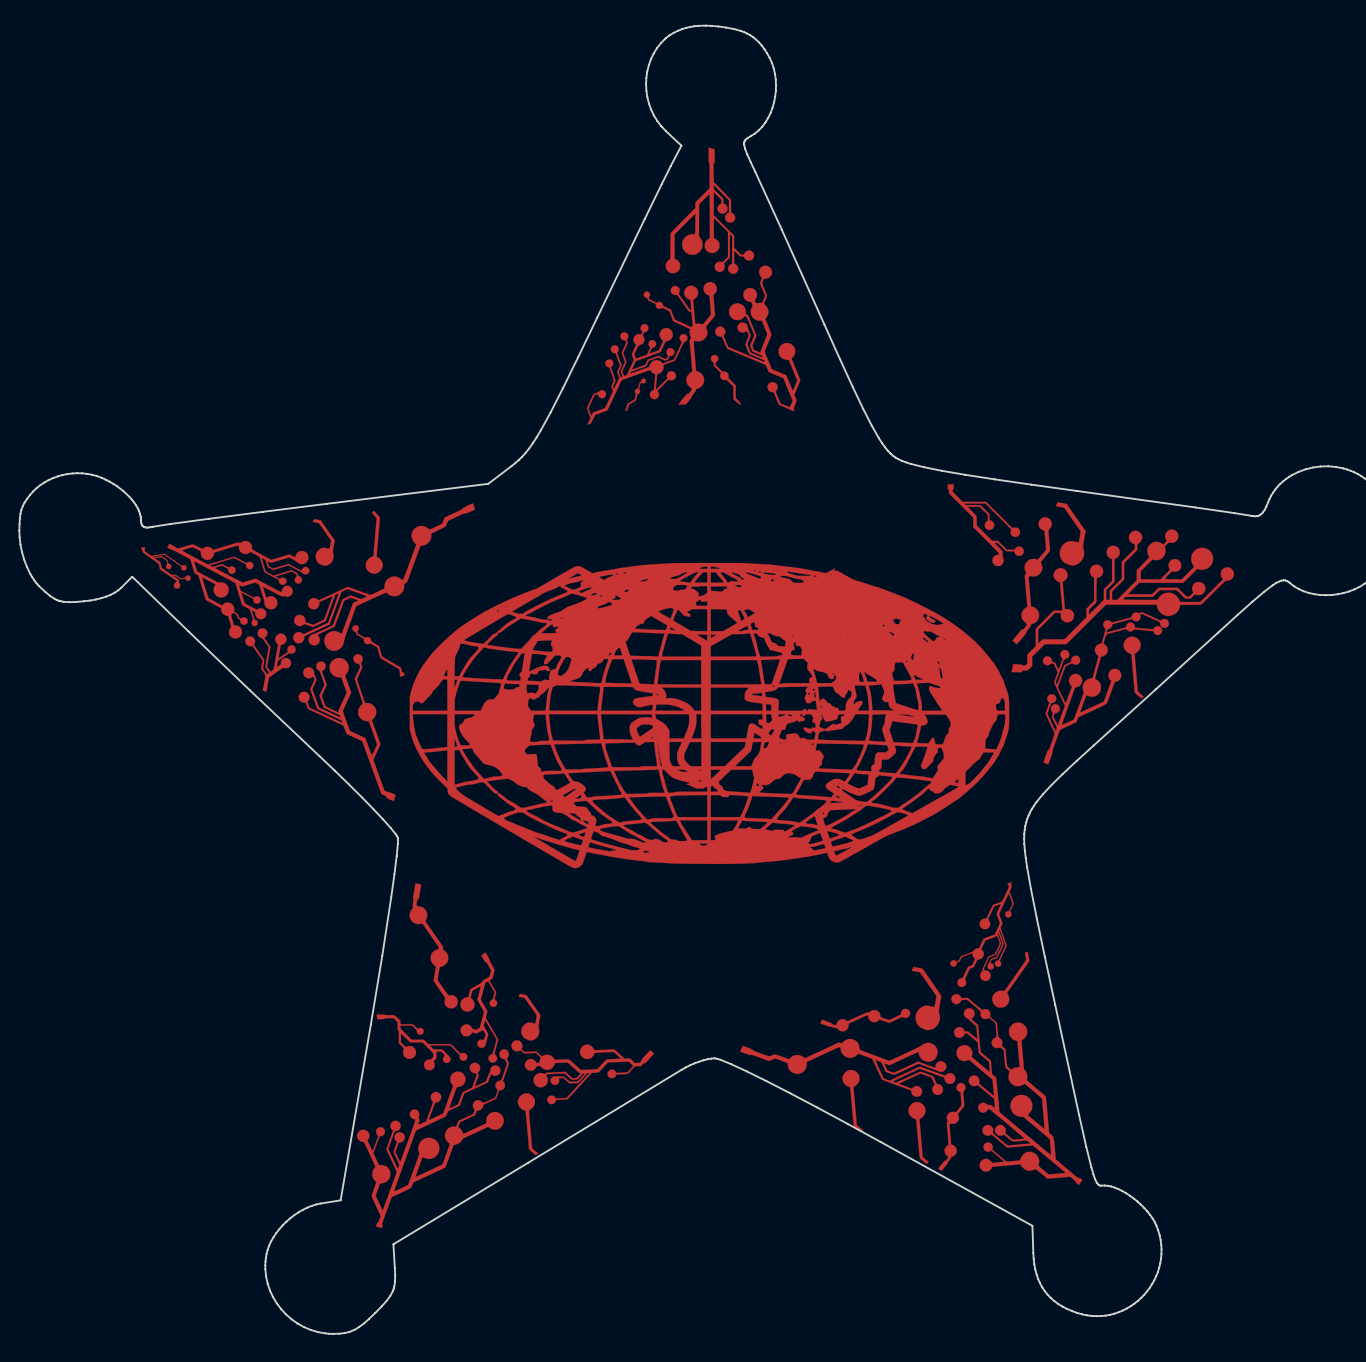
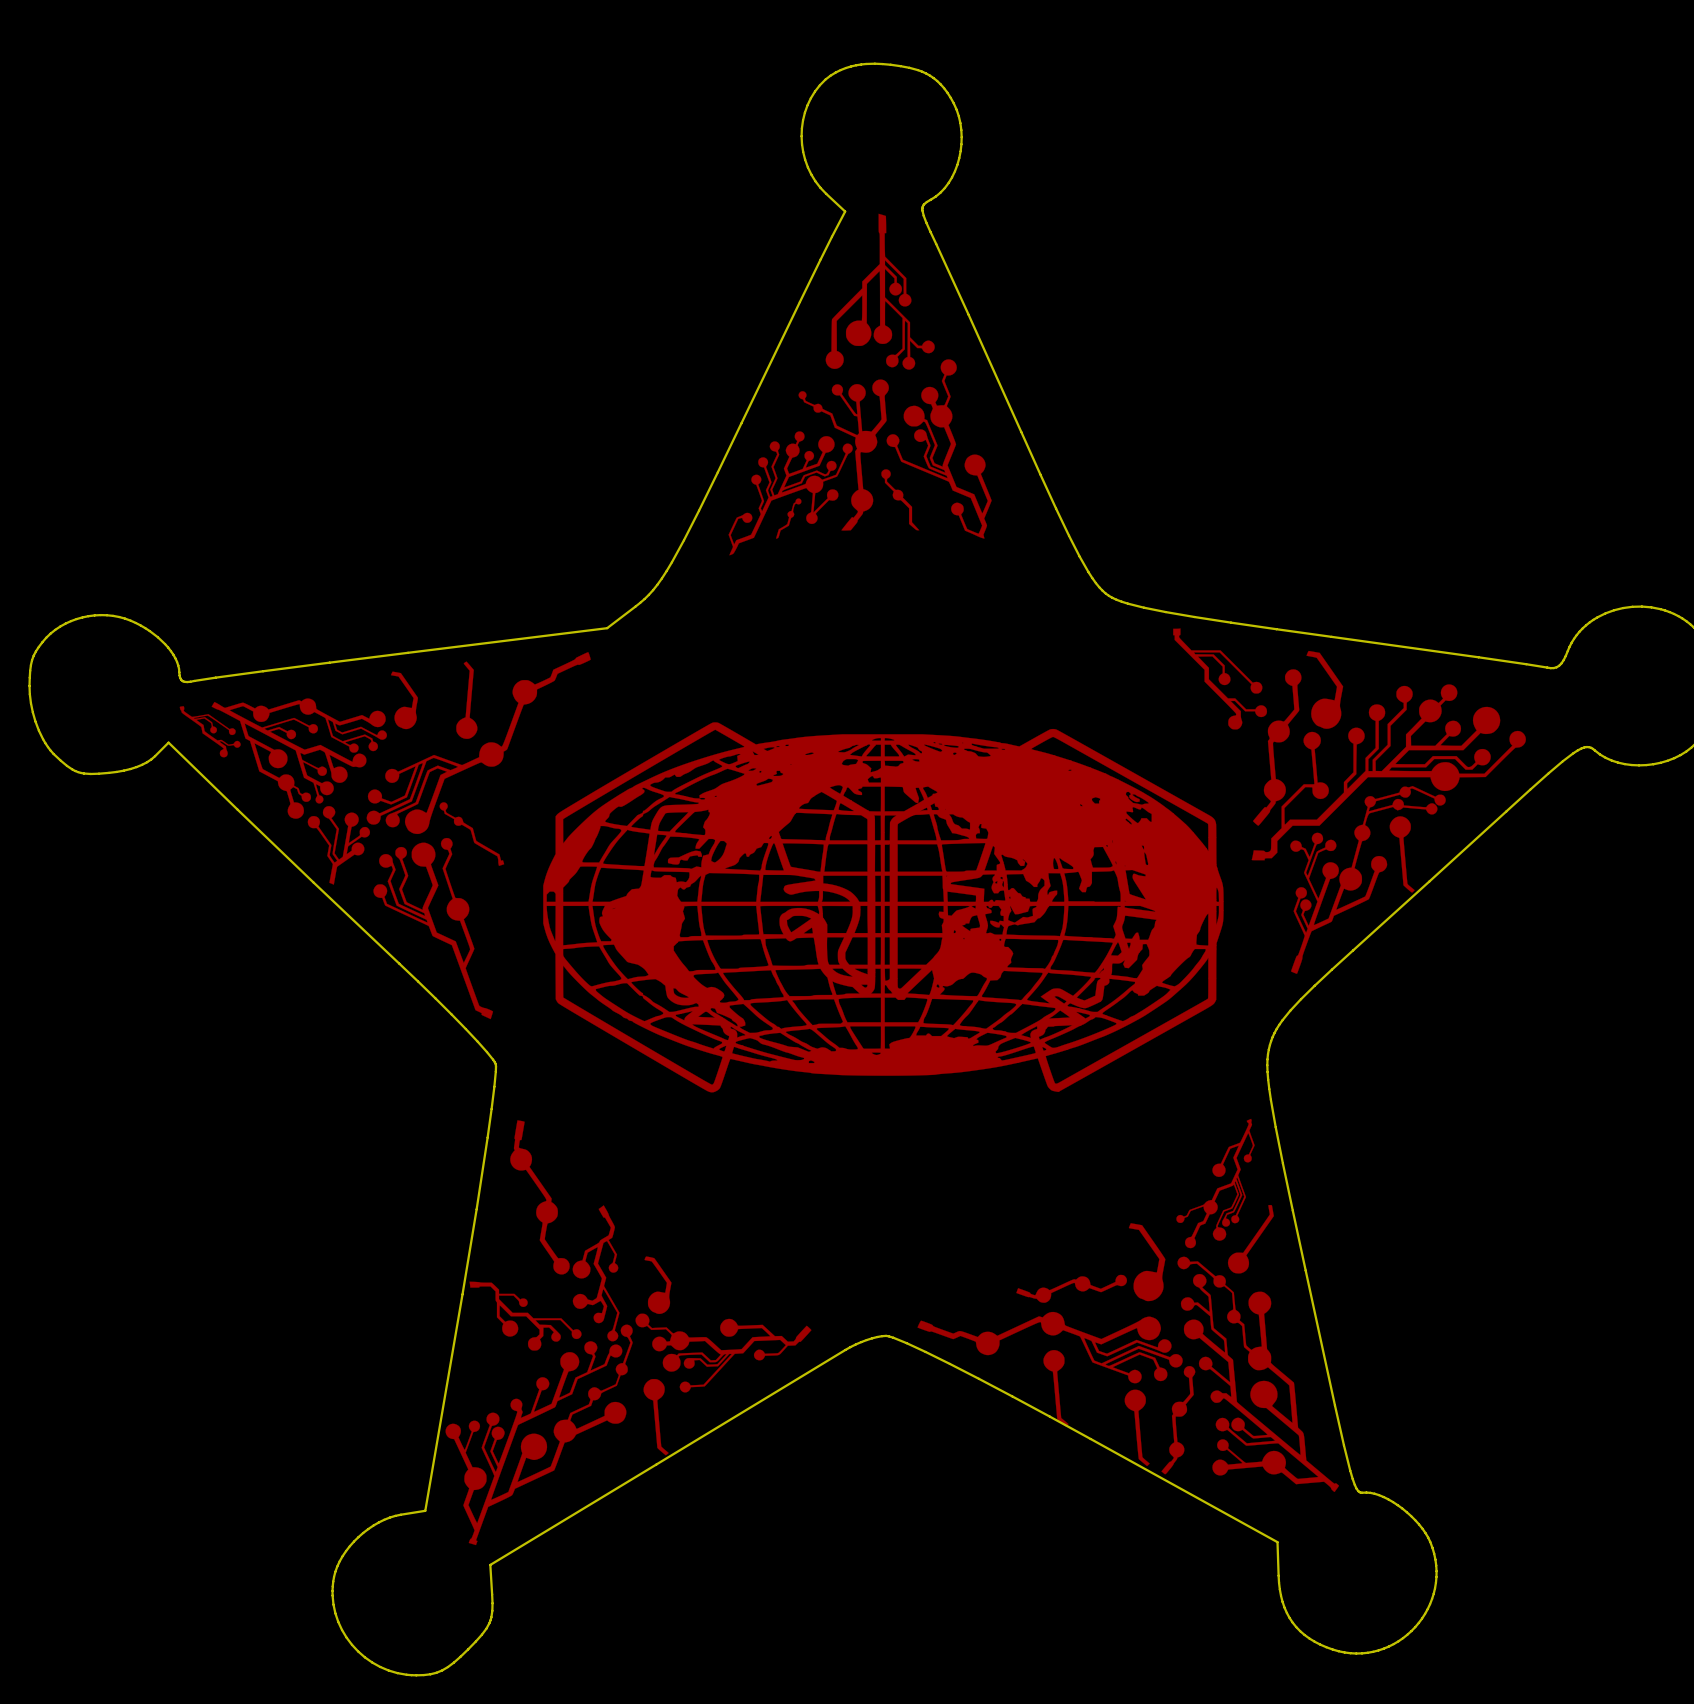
drawing shape: [141, 147, 1235, 1229] -> [179, 213, 1526, 1546]

